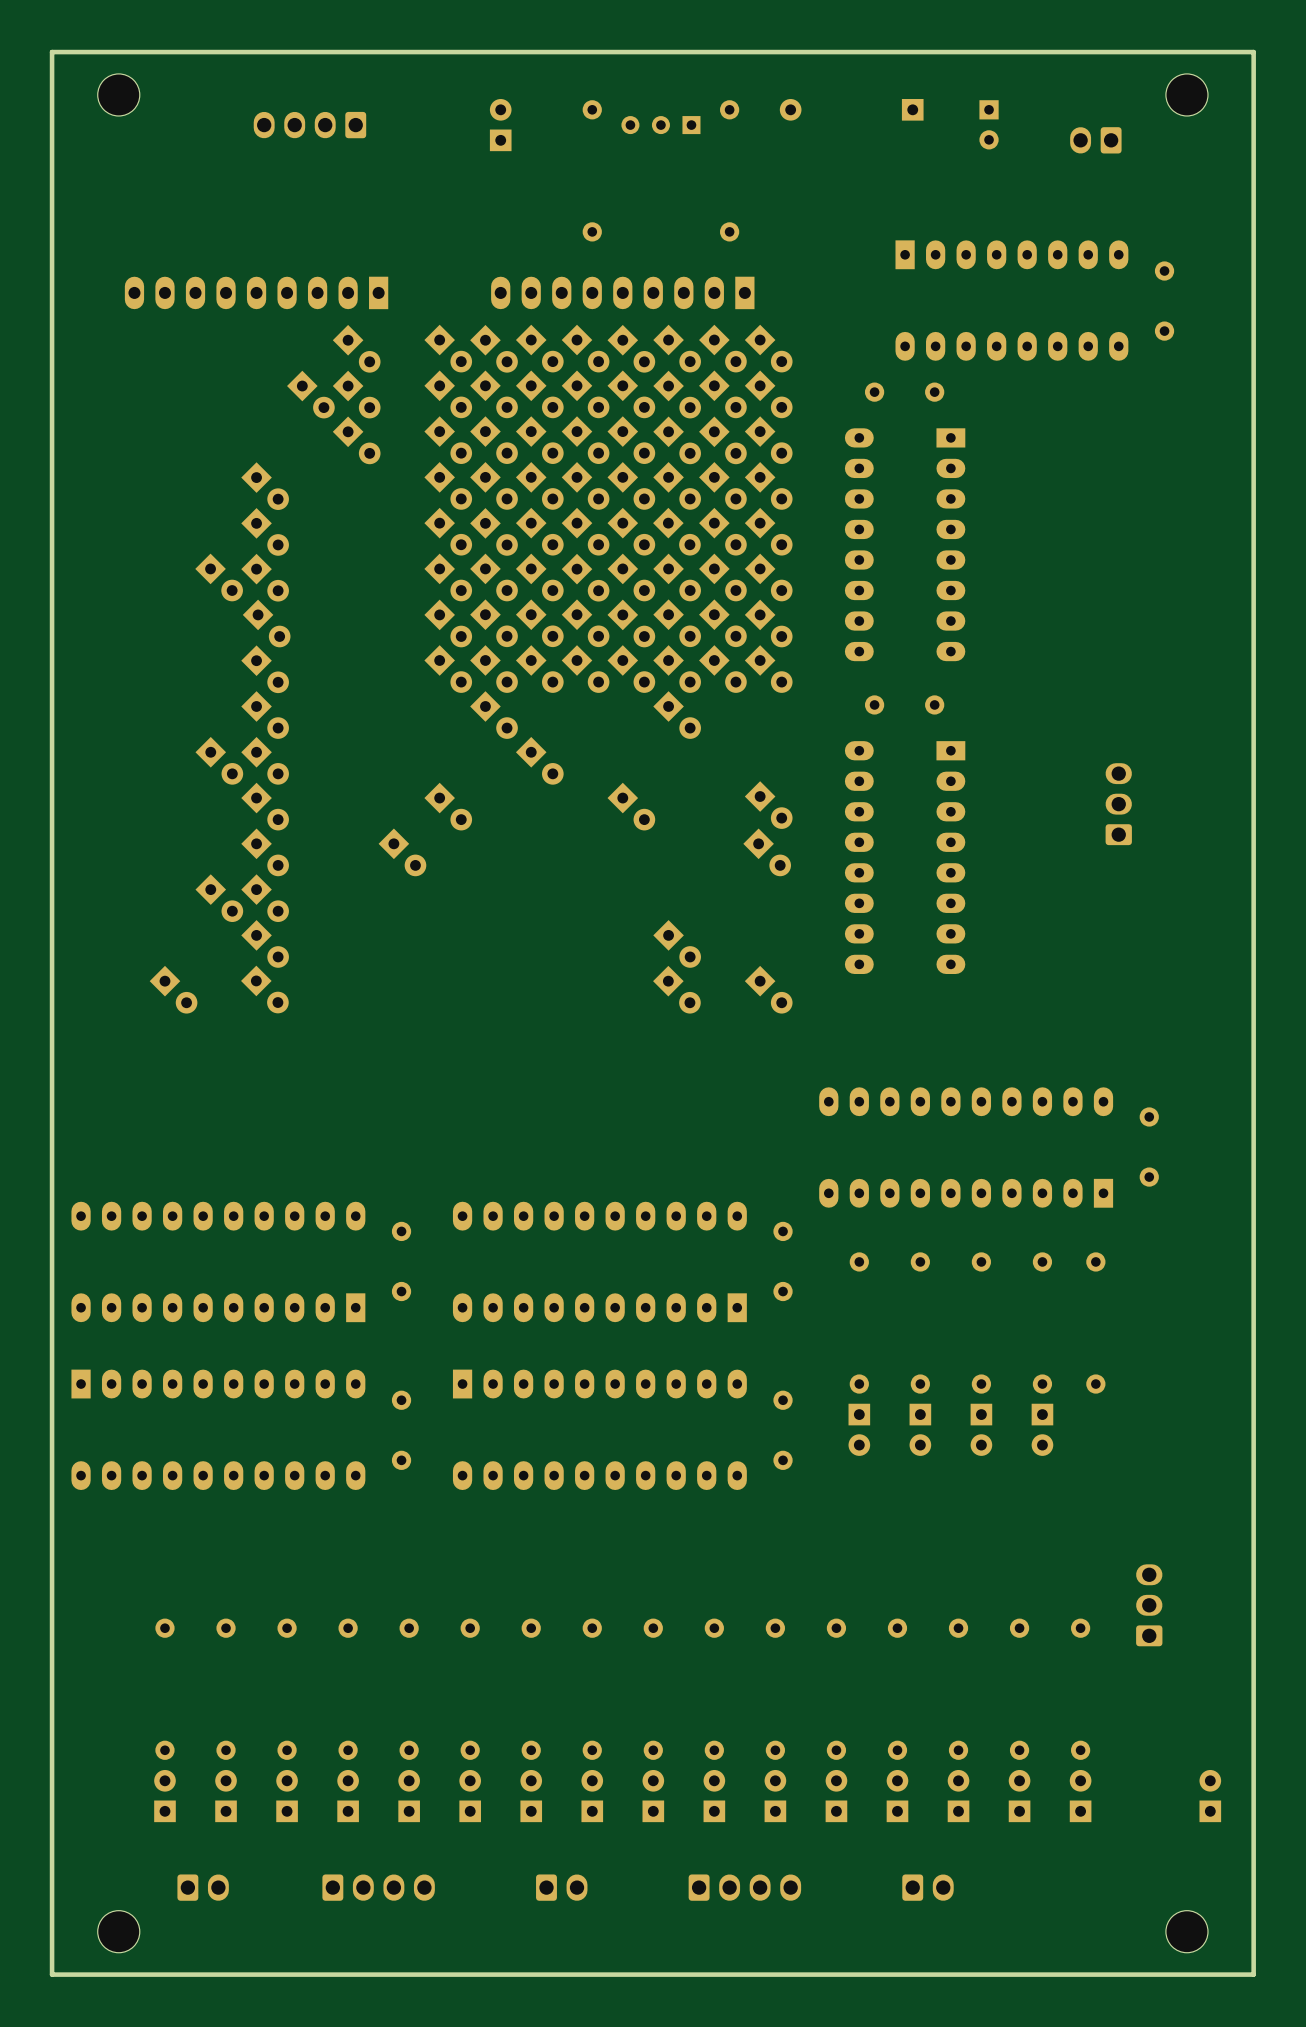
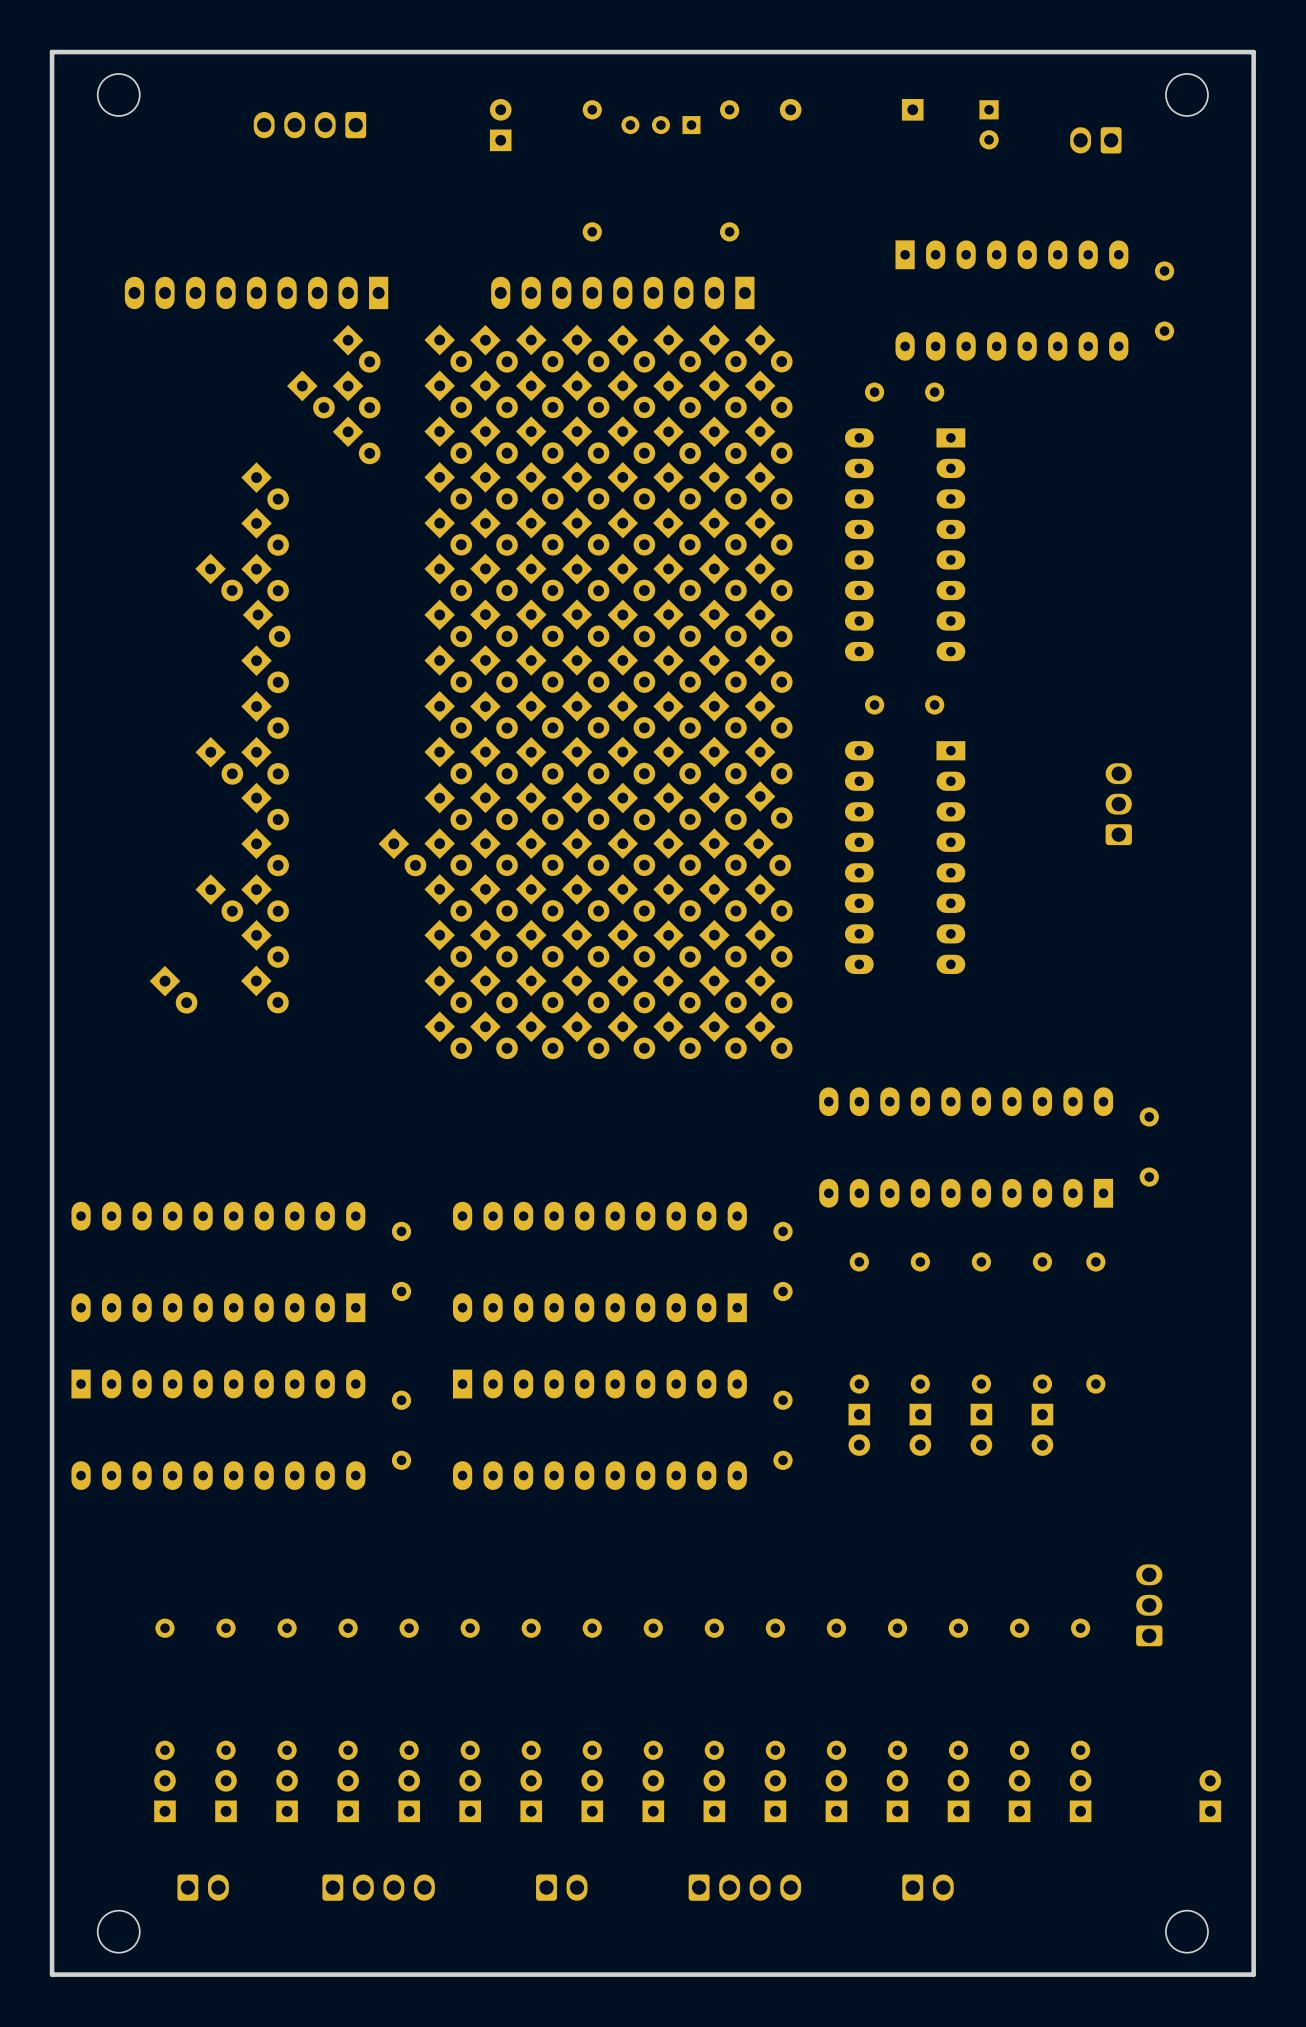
part: none -> (448, 714)
part: none -> (539, 714)
part: none -> (585, 714)
part: none -> (631, 714)
part: none -> (722, 714)
part: none -> (768, 714)
part: none -> (448, 760)
part: none -> (494, 760)
part: none -> (585, 760)
part: none -> (631, 760)
part: none -> (677, 760)
part: none -> (722, 760)
part: none -> (768, 760)
part: none -> (494, 806)
part: none -> (539, 806)
part: none -> (585, 806)
part: none -> (677, 806)
part: none -> (722, 806)
part: none -> (448, 852)
part: none -> (494, 852)
part: none -> (539, 852)
part: none -> (585, 852)
part: none -> (631, 852)
part: none -> (677, 852)
part: none -> (722, 852)
part: none -> (448, 897)
part: none -> (494, 897)
part: none -> (539, 897)
part: none -> (585, 897)
part: none -> (631, 897)
part: none -> (677, 897)
part: none -> (722, 897)
part: none -> (768, 897)
part: none -> (448, 943)
part: none -> (494, 943)
part: none -> (539, 943)
part: none -> (585, 943)
part: none -> (631, 943)
part: none -> (722, 943)
part: none -> (768, 943)
part: none -> (448, 989)
part: none -> (494, 989)
part: none -> (539, 989)
part: none -> (585, 989)
part: none -> (631, 989)
part: none -> (722, 989)
part: none -> (448, 1035)
part: none -> (494, 1035)
part: none -> (539, 1035)
part: none -> (585, 1035)
part: none -> (631, 1035)
part: none -> (677, 1035)
part: none -> (722, 1035)
part: none -> (768, 1035)

